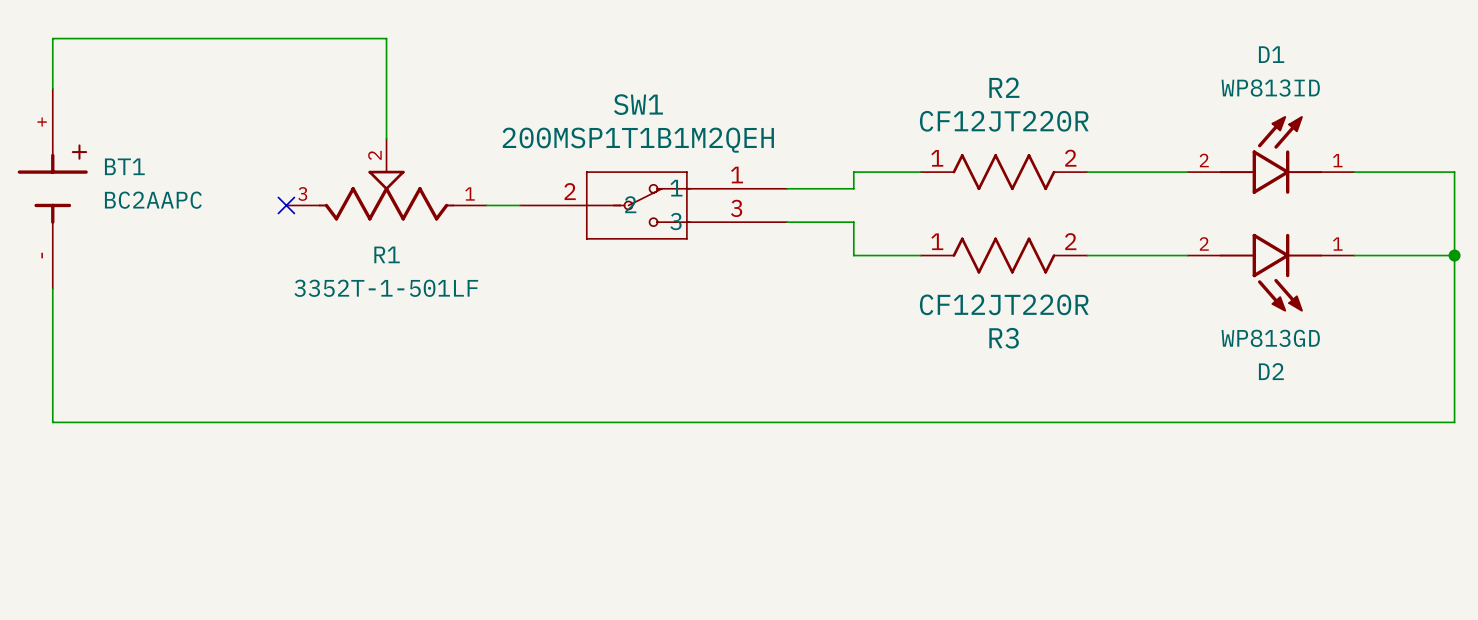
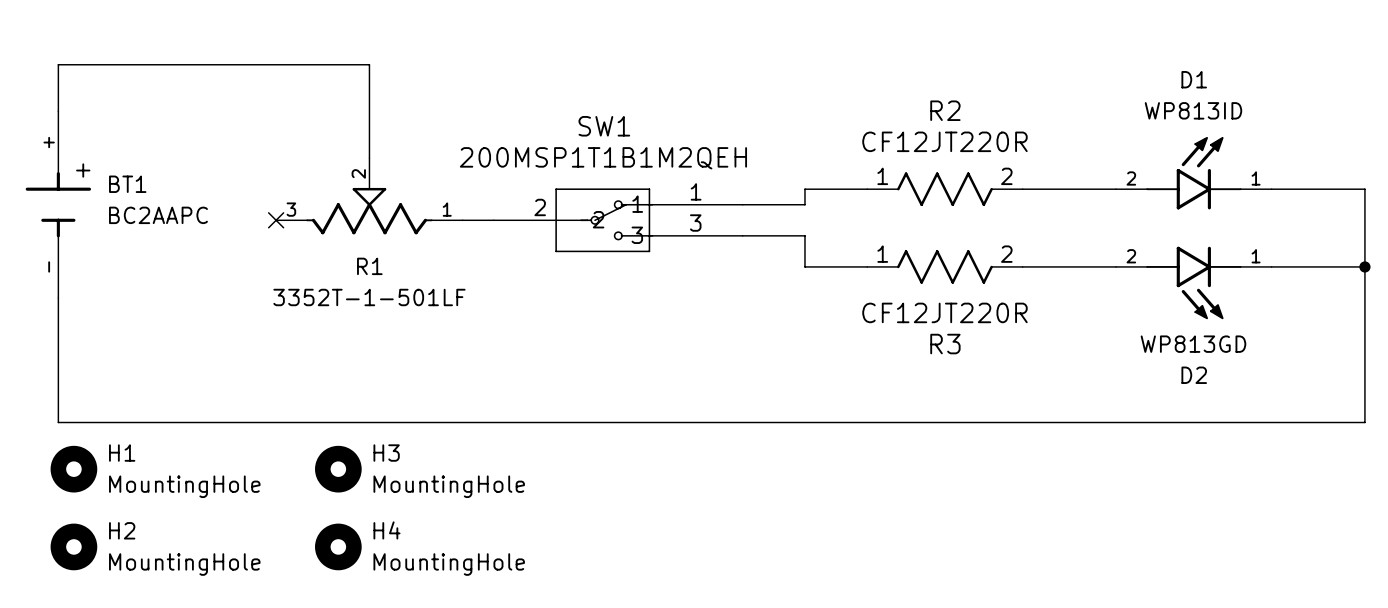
H1: none -> MountingHole (73, 469)
H3: none -> MountingHole (338, 469)
H2: none -> MountingHole (73, 546)
H4: none -> MountingHole (338, 546)

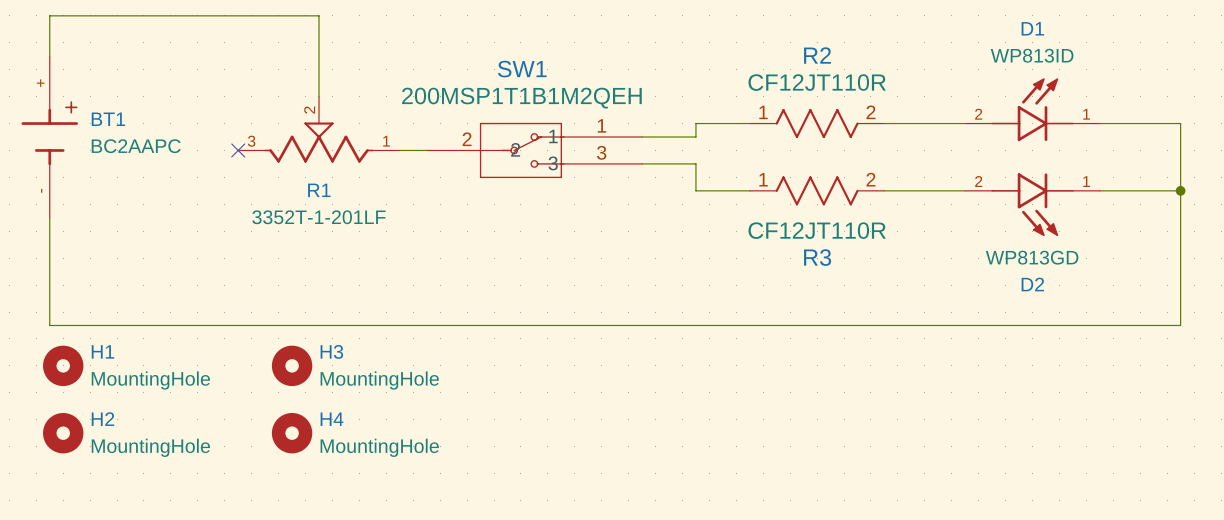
R2 value: CF12JT220R (944, 141) -> CF12JT110R (817, 82)
R1 value: 3352T-1-501LF (369, 297) -> 3352T-1-201LF (318, 217)
R3 value: CF12JT220R (944, 312) -> CF12JT110R (817, 230)

